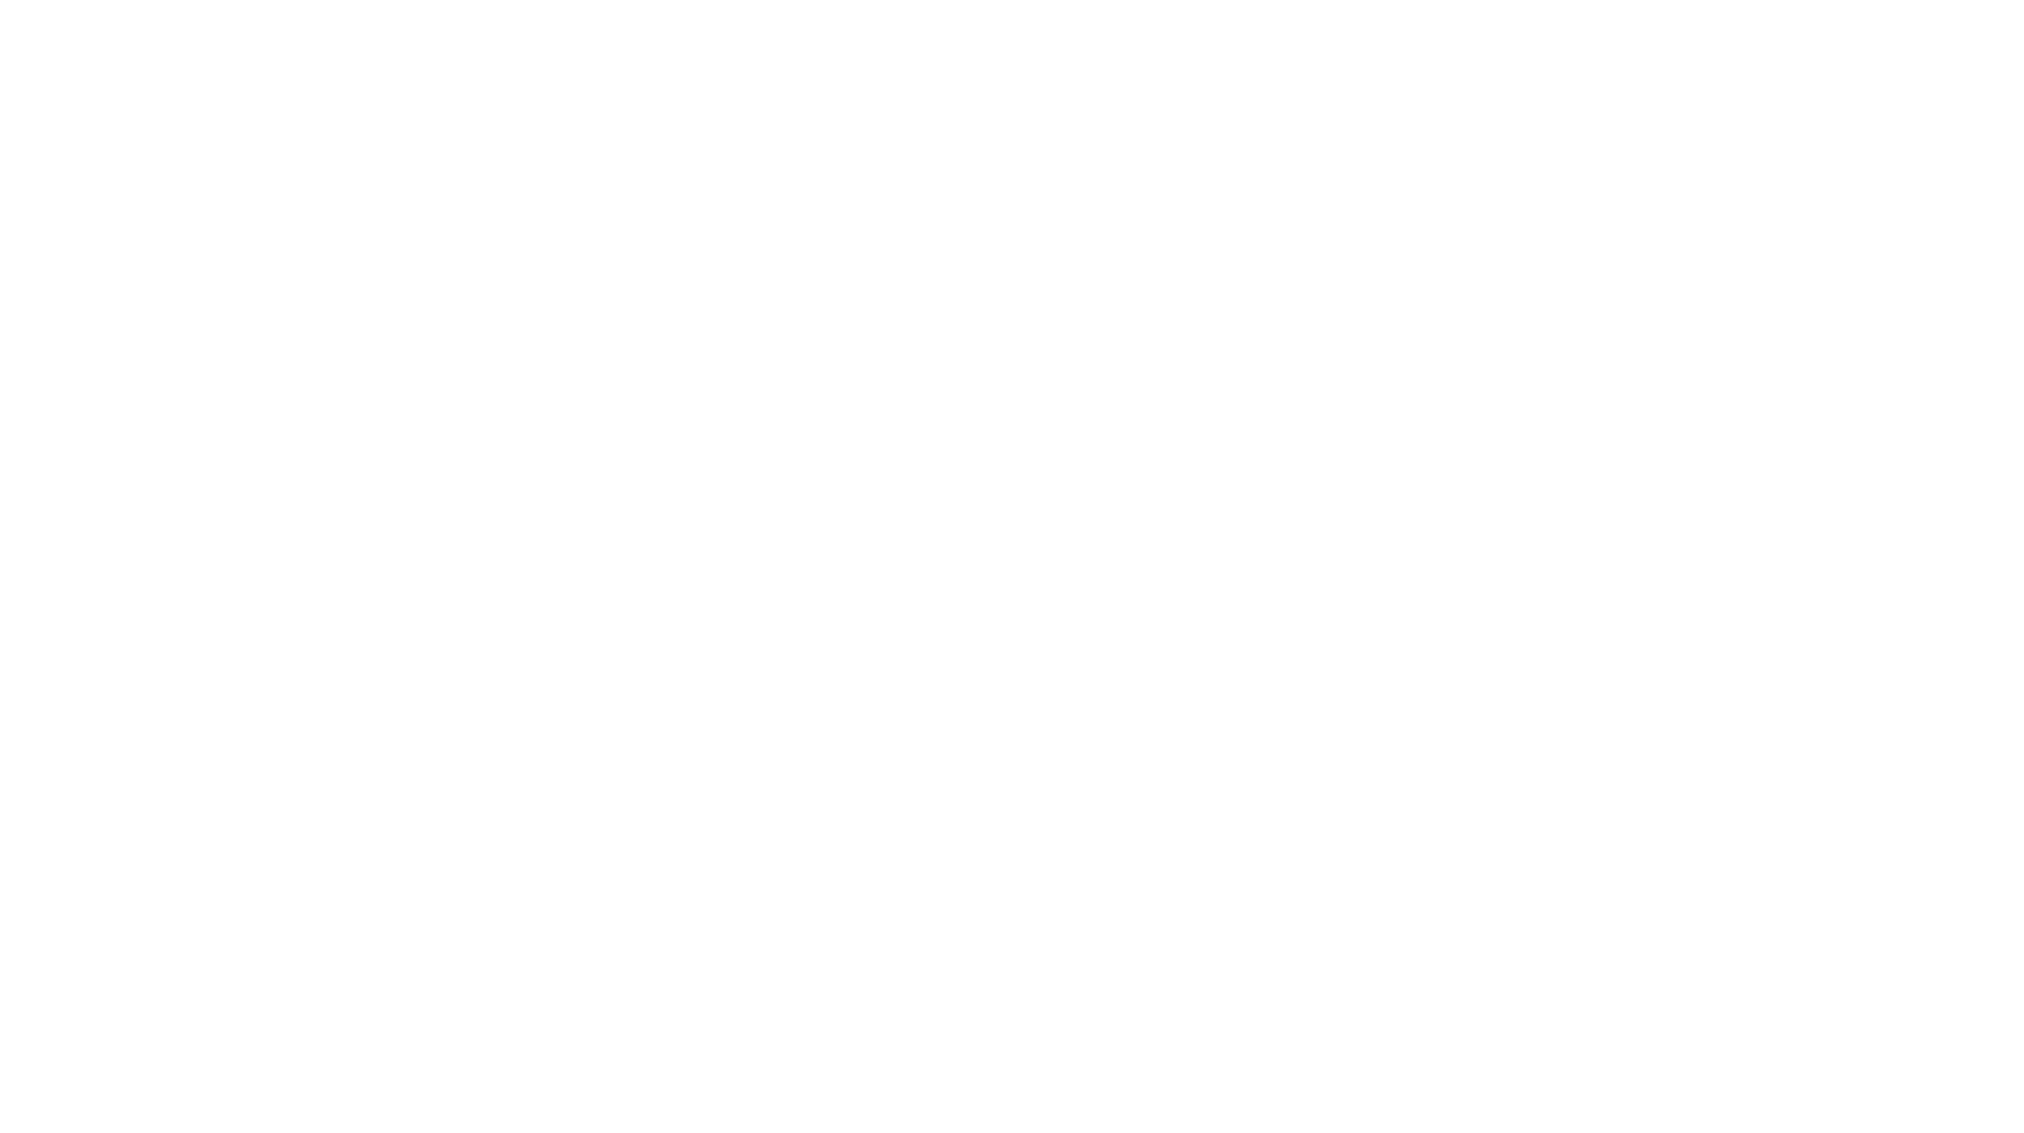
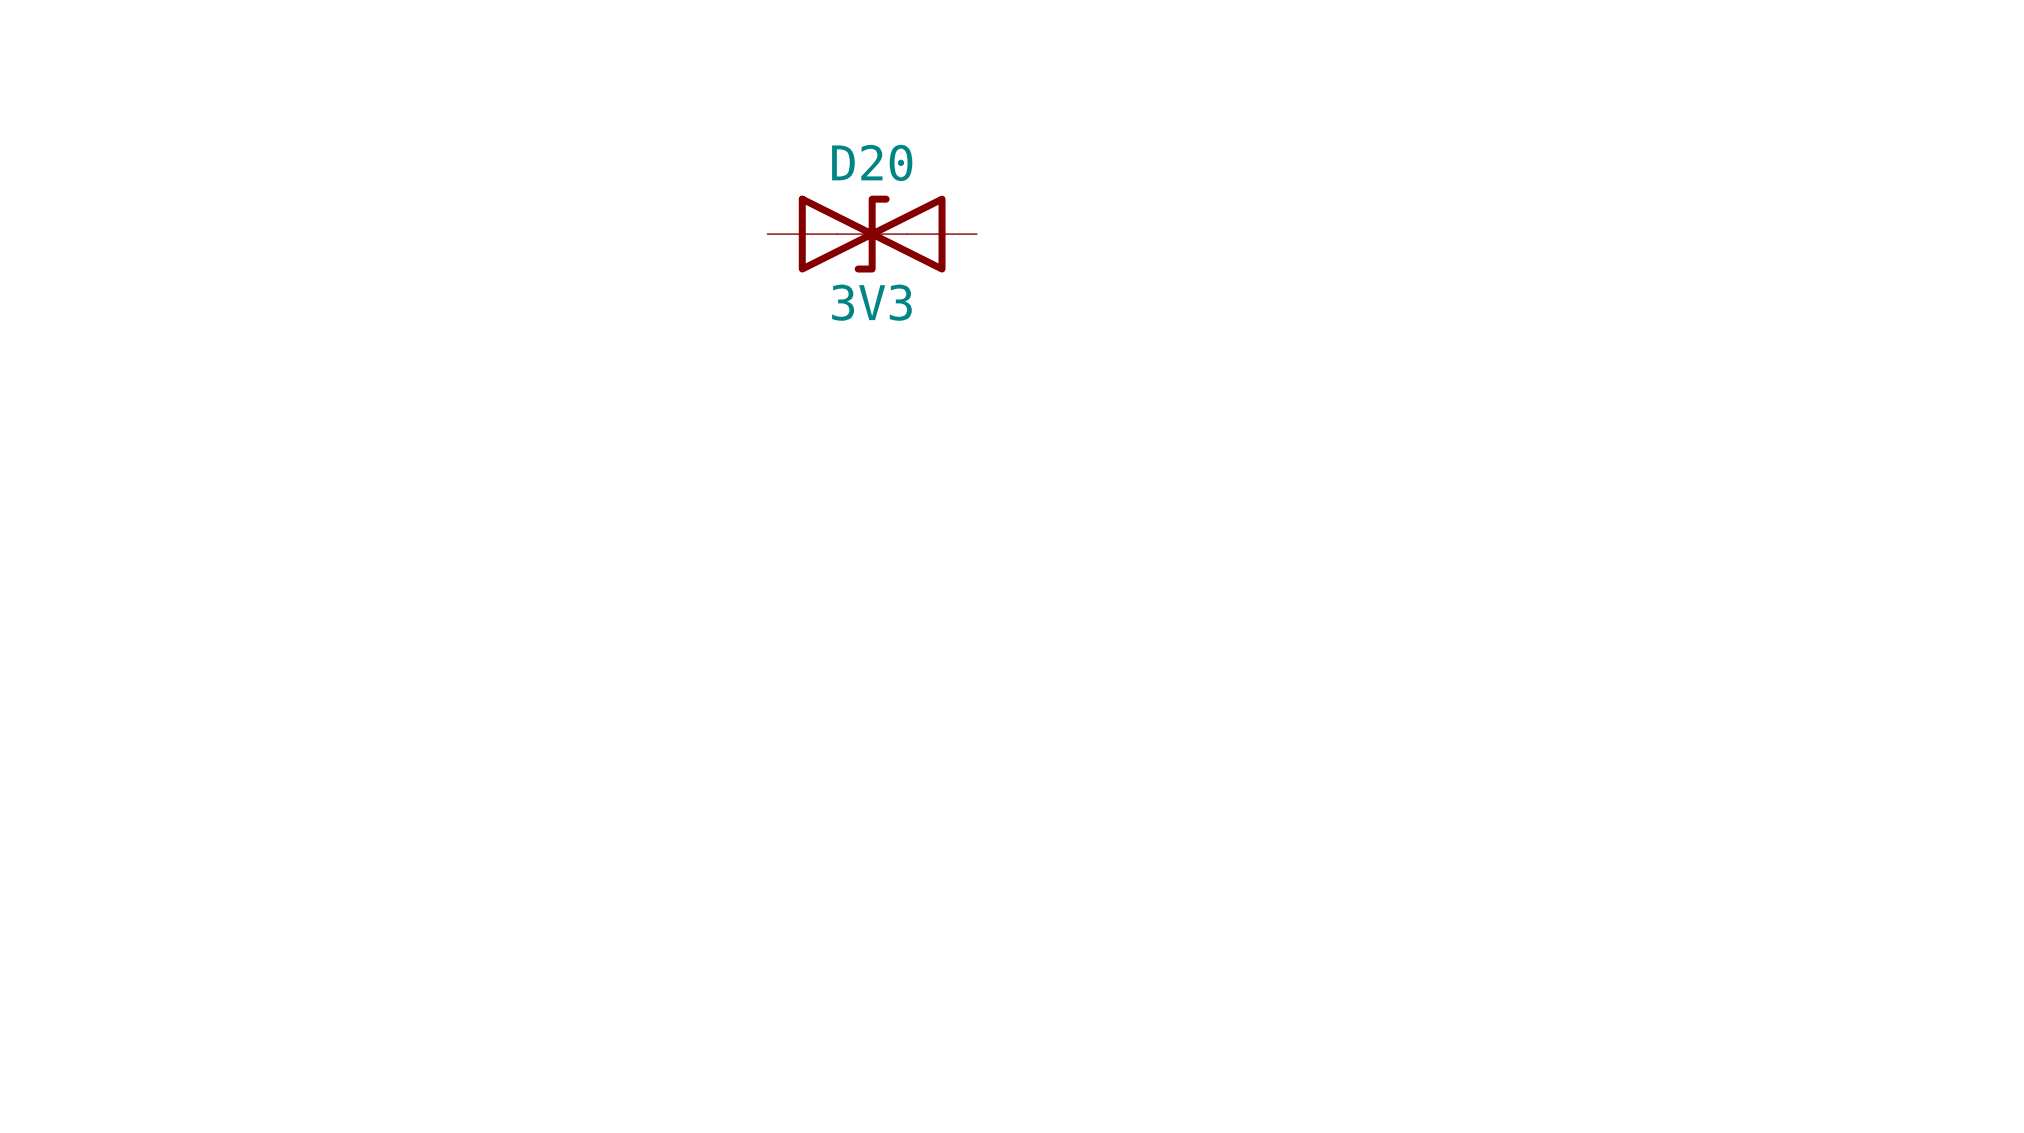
D20: none -> 3V3 (872, 234)

